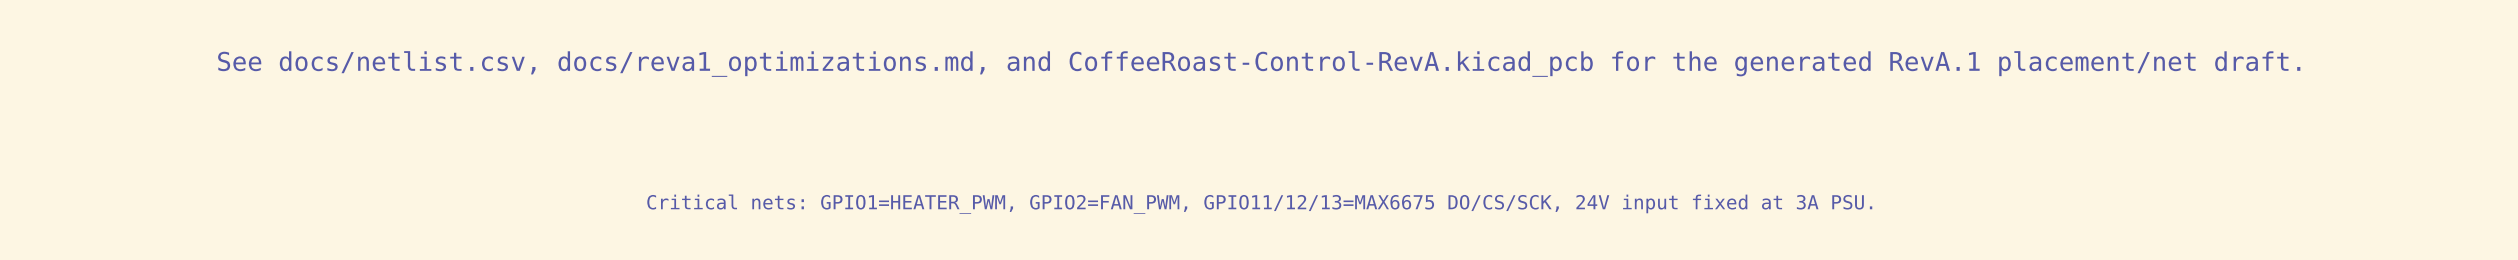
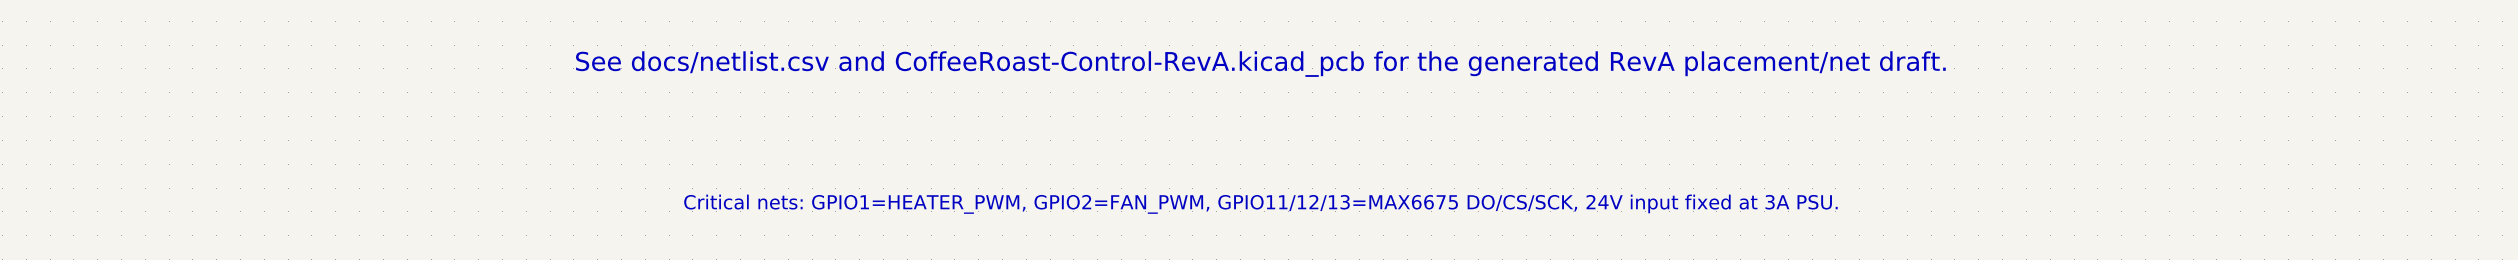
text: See docs/netlist.csv, docs/reva1_optimizations.md, and CoffeeRoast-Control-RevA.kicad_pcb for the generated RevA.1 placement/net draft. (1259, 64) -> See docs/netlist.csv and CoffeeRoast-Control-RevA.kicad_pcb for the generated RevA placement/net draft. (1260, 64)

